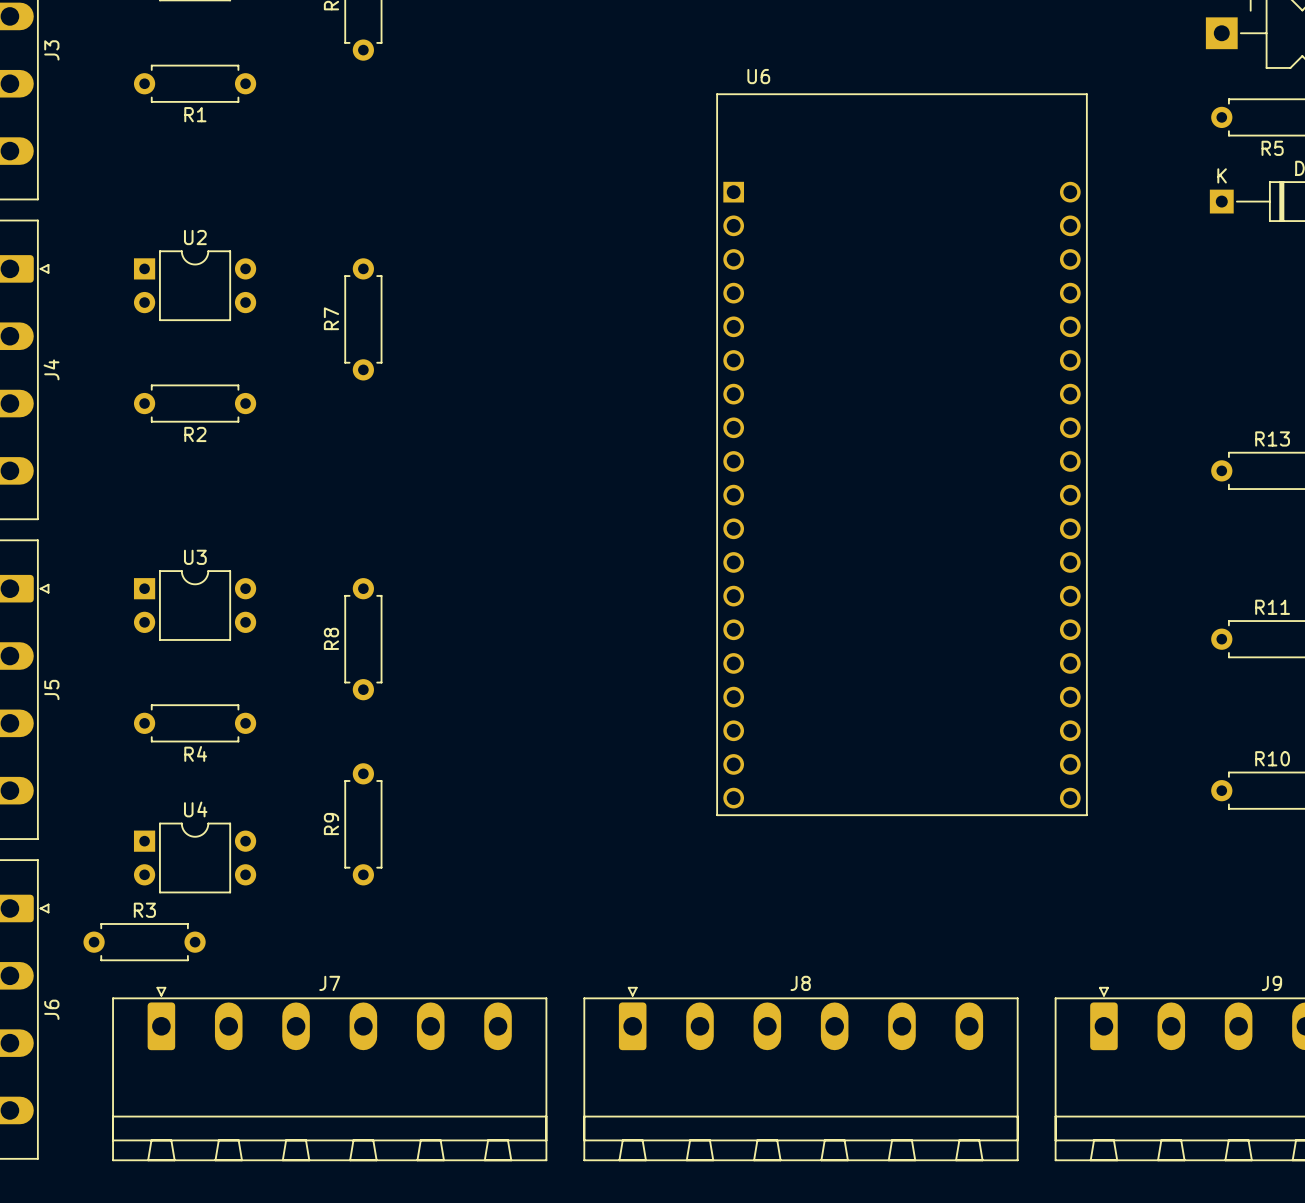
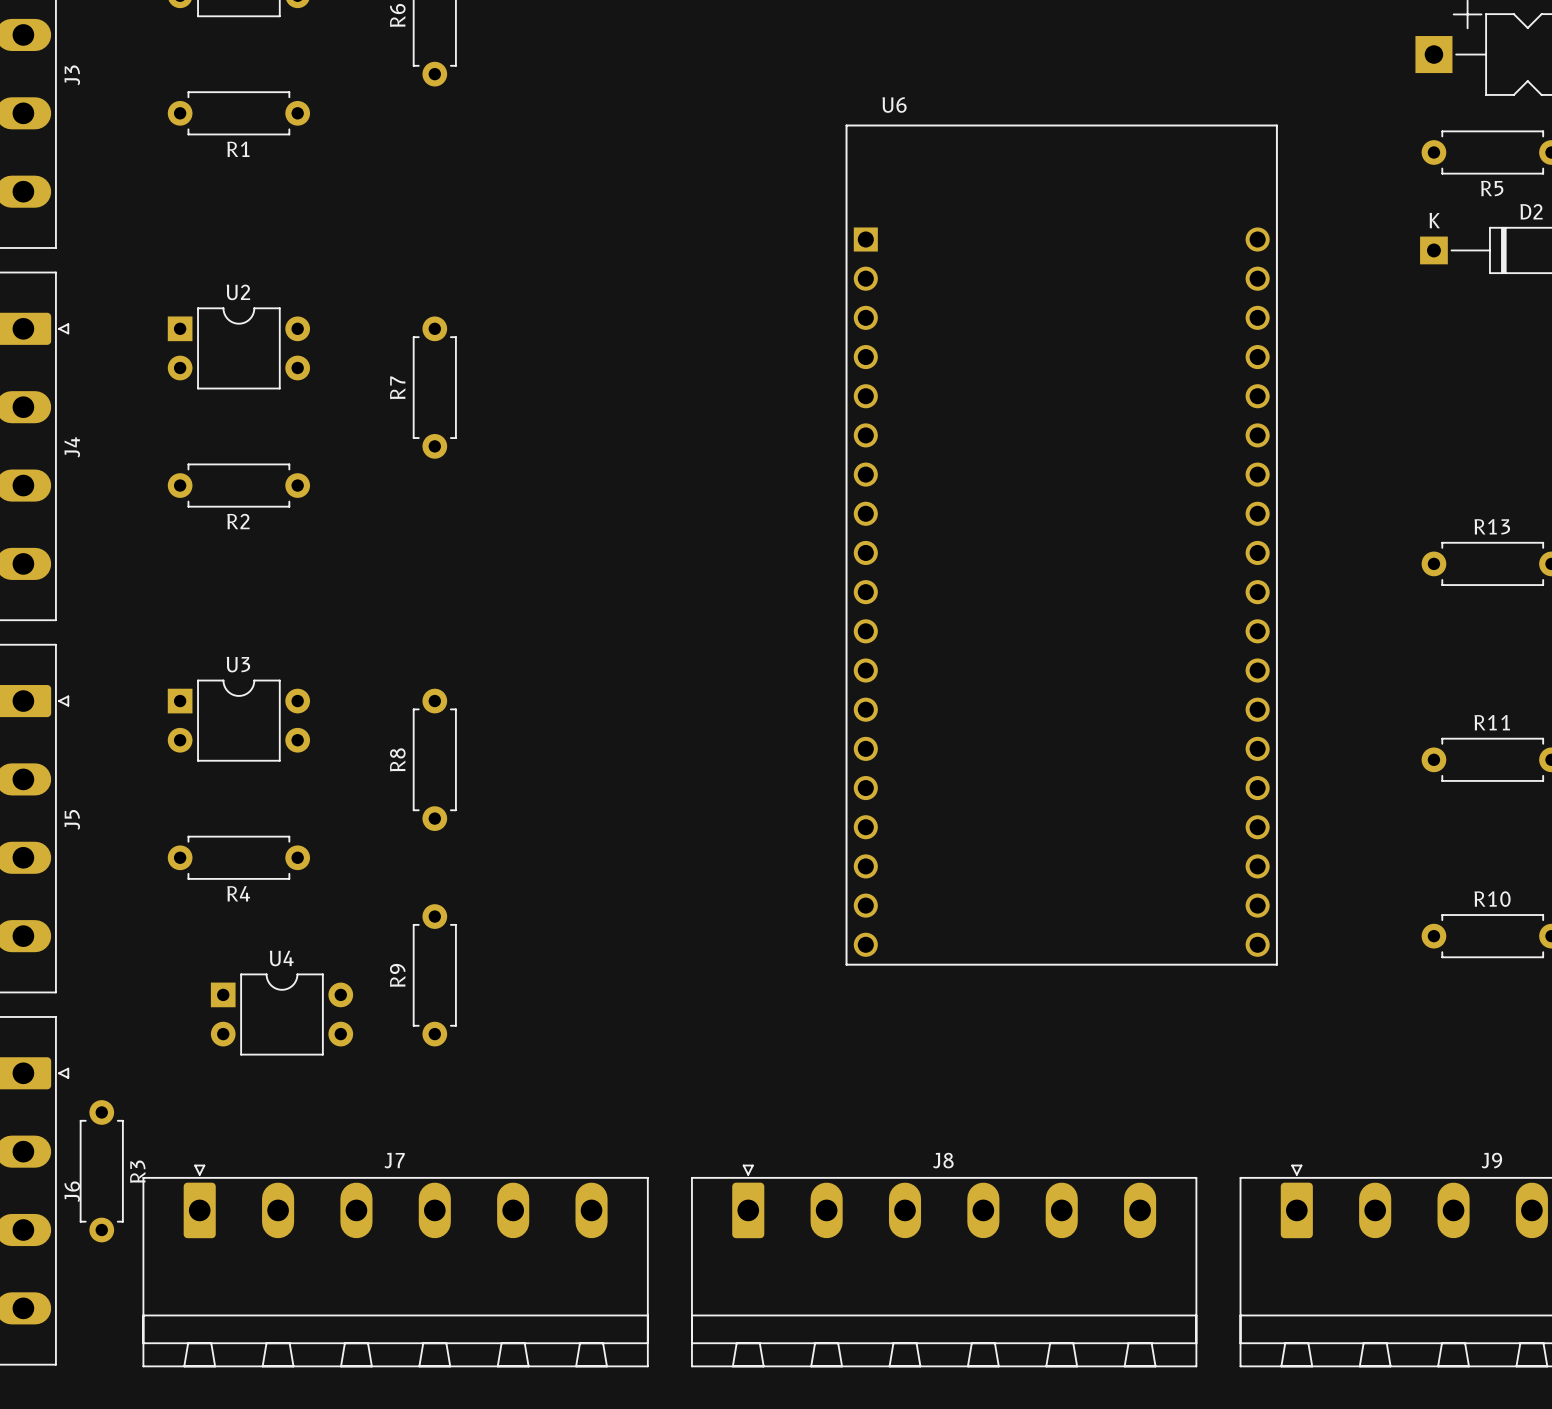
U4 position: (195, 857) -> (282, 1014)
R3 rotation: 0° (144, 942) -> 90° clockwise (101, 1171)
R3 position: (144, 942) -> (101, 1171)

